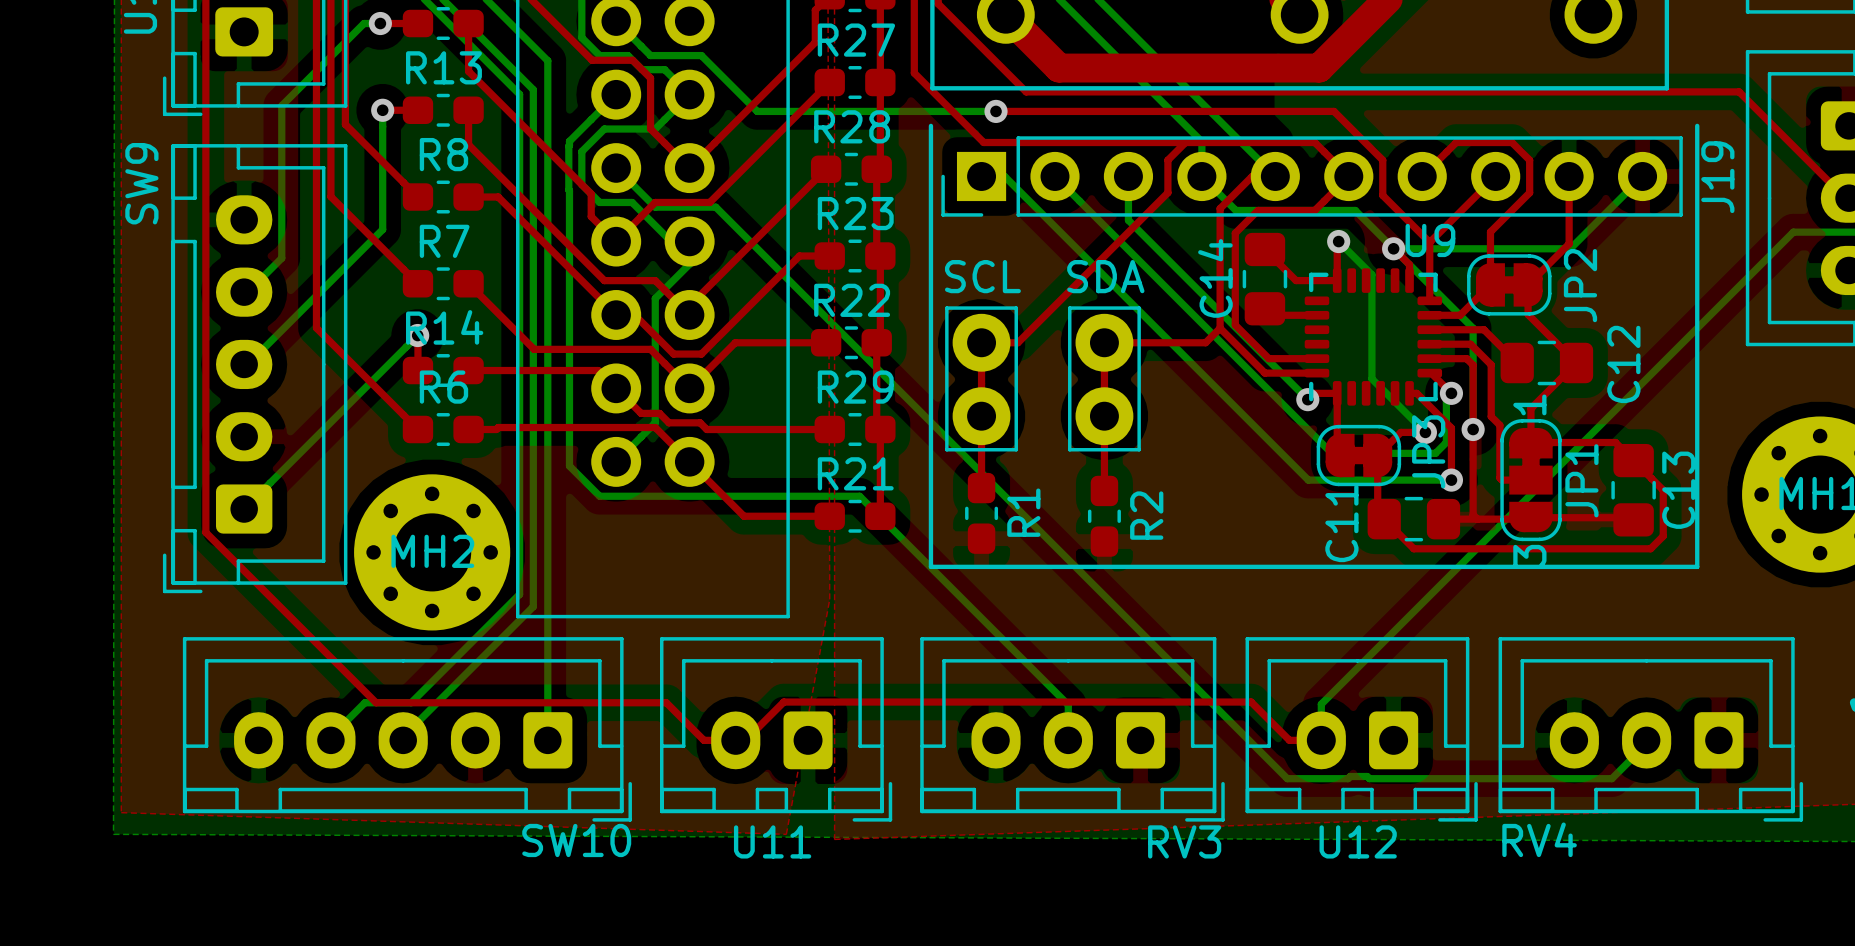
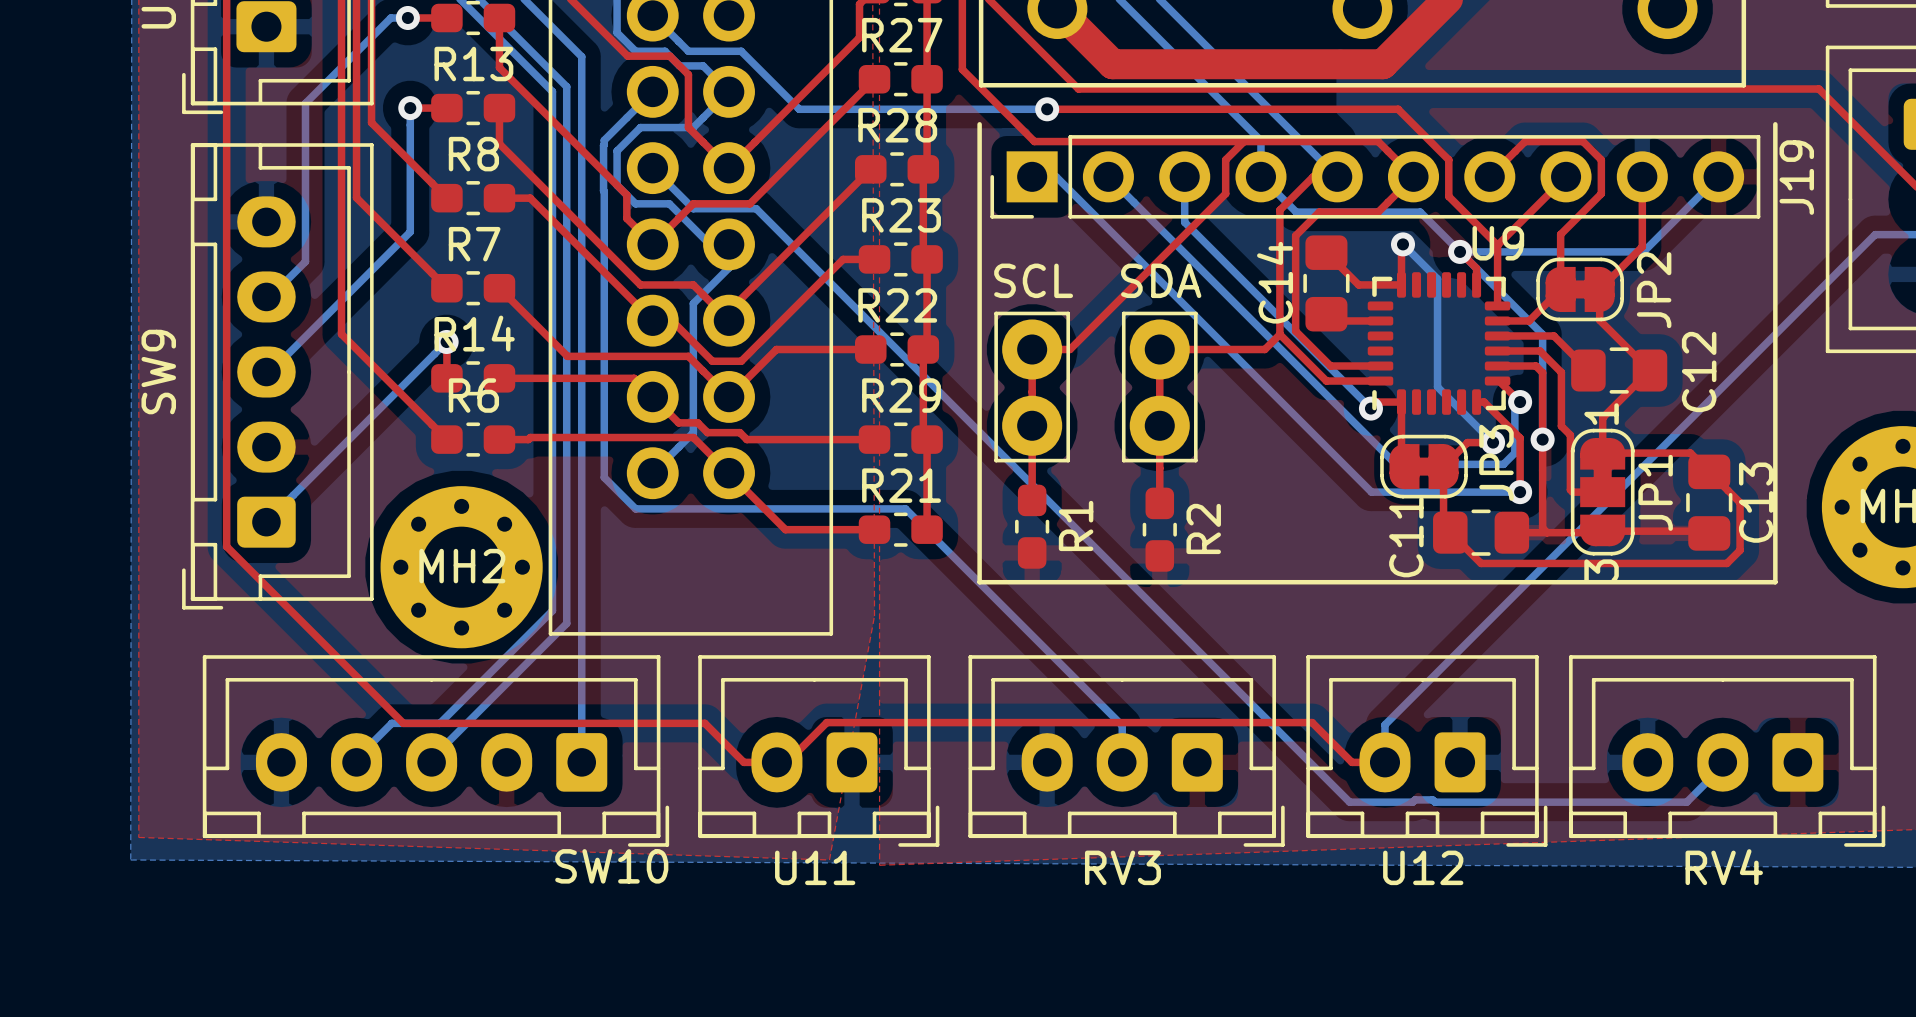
SW9 name position: SW9 (141, 183) -> SW9 (158, 372)
RV4 name position: RV4 (1539, 839) -> RV4 (1724, 867)
RV3 name position: RV3 (1184, 841) -> RV3 (1122, 867)

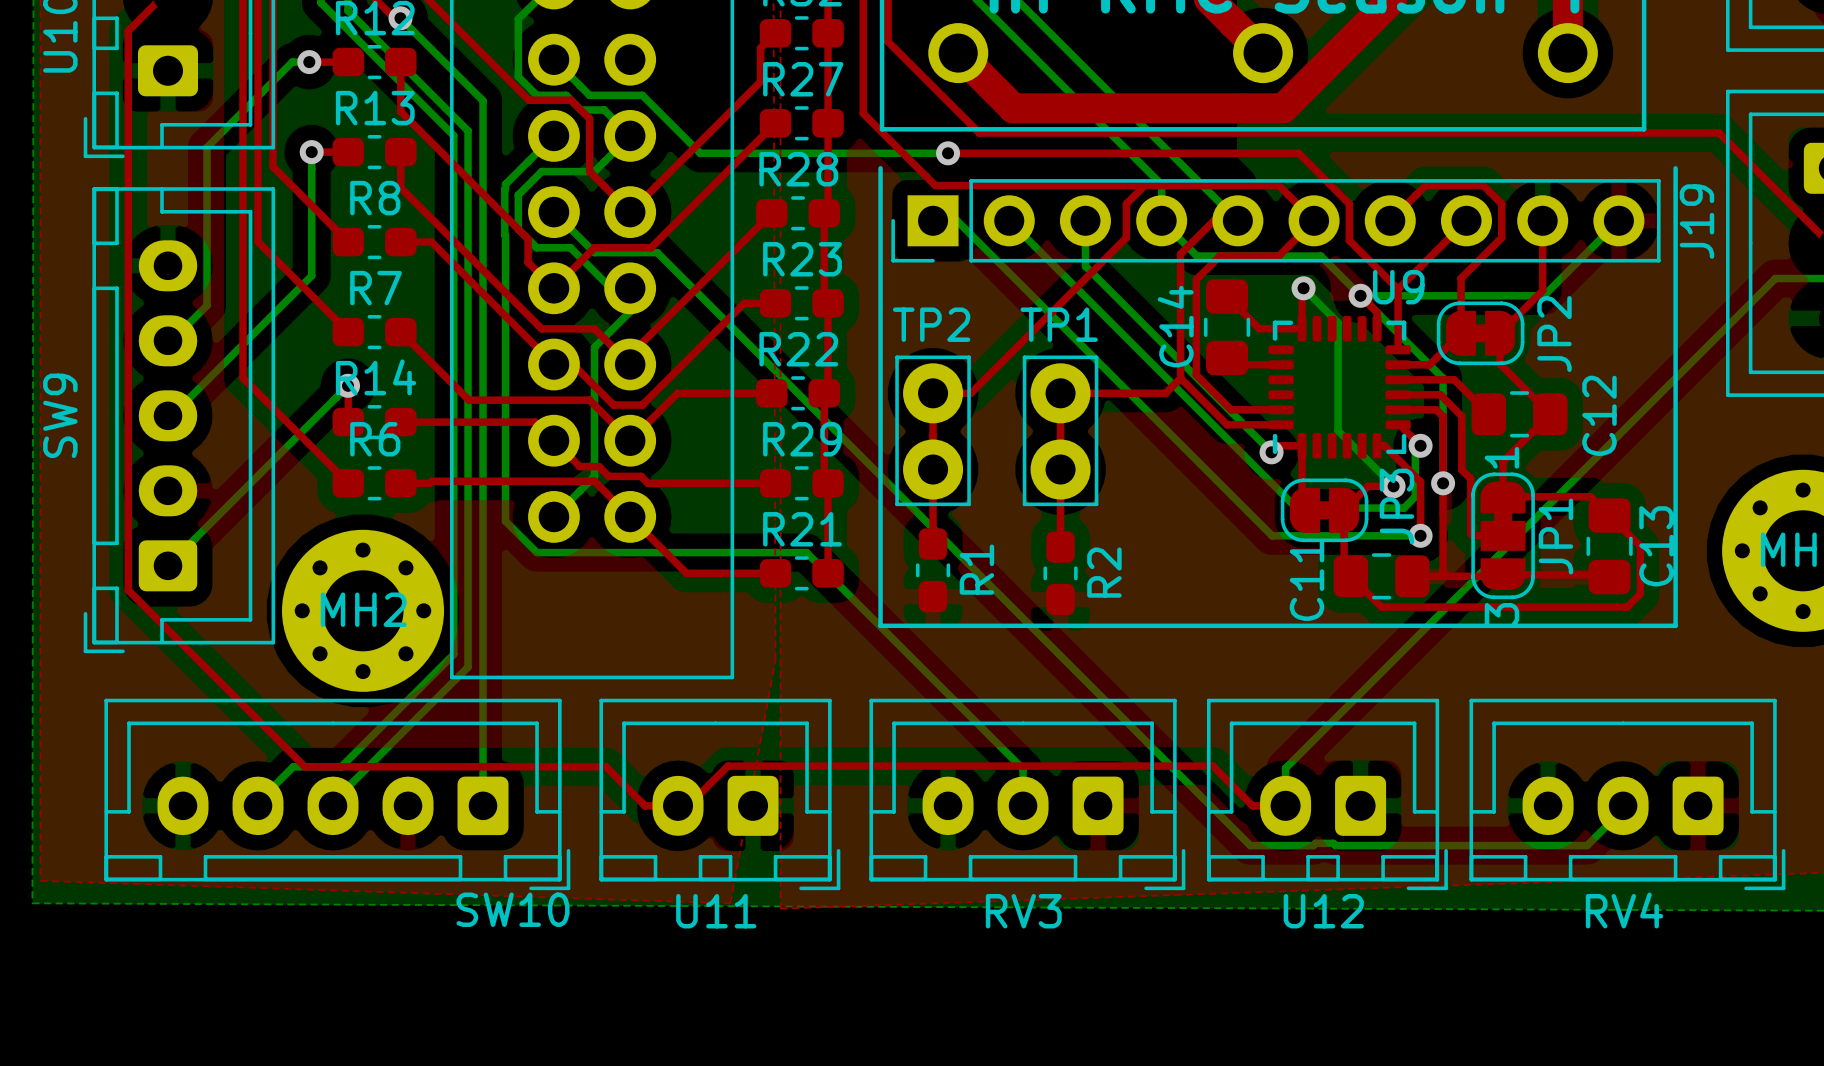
TP2 name: none -> TP2 (931, 324)
TP2 text: SCL (1033, 280) -> none
TP1 name: none -> TP1 (1059, 324)
TP1 text: SDA (1161, 280) -> none

